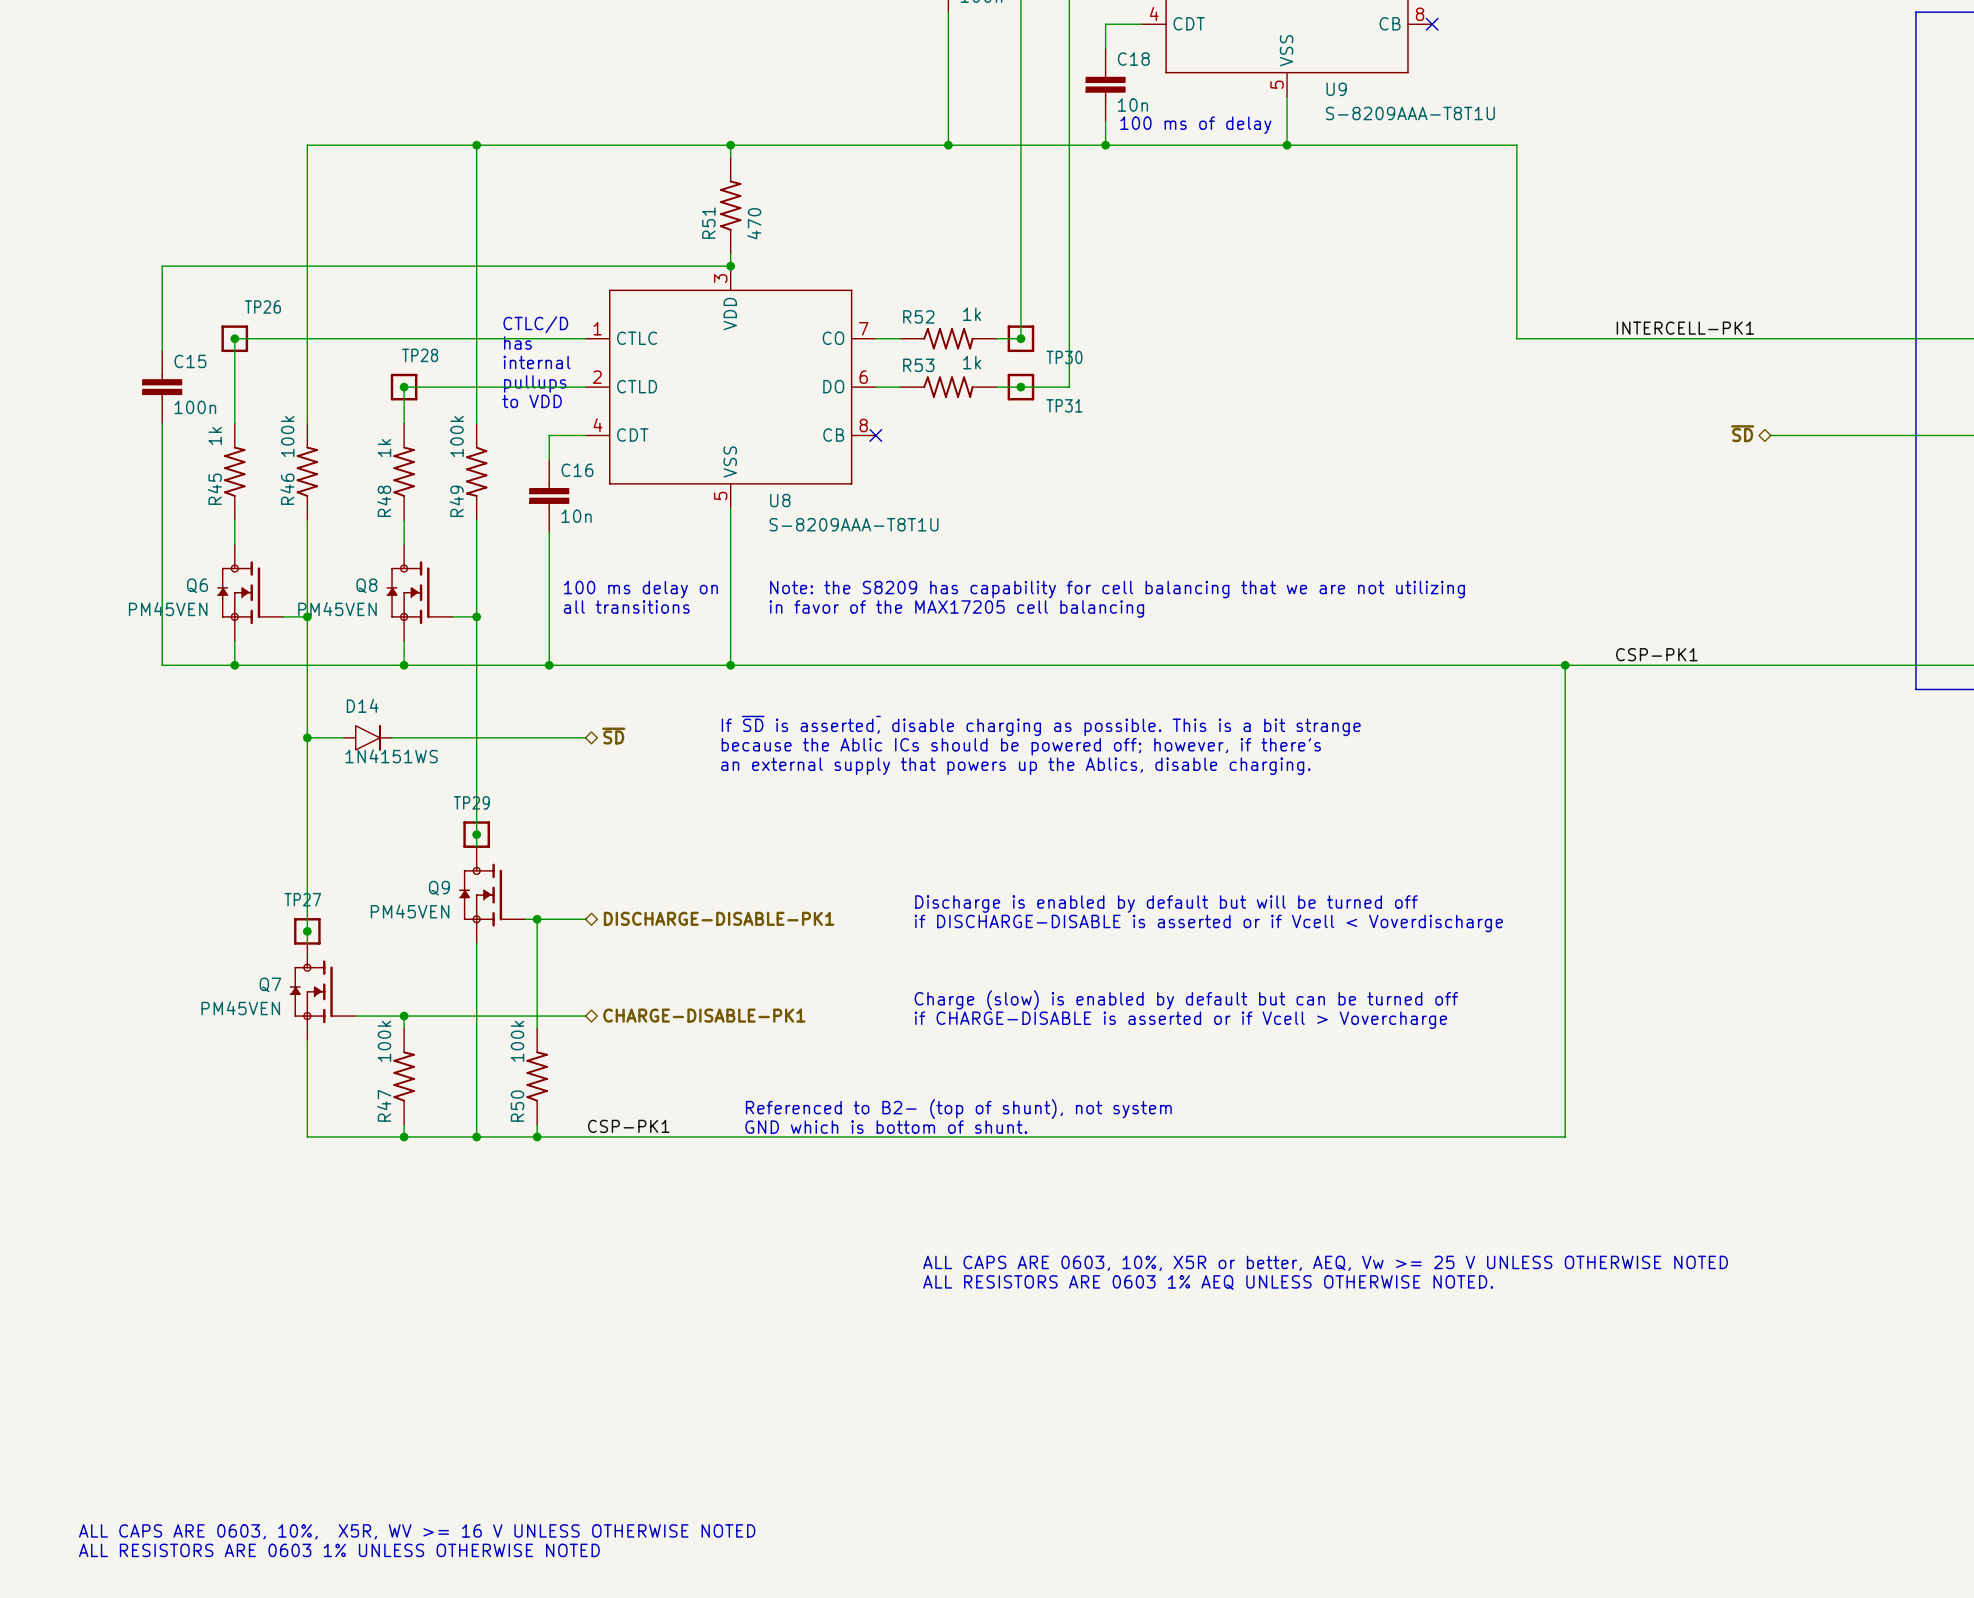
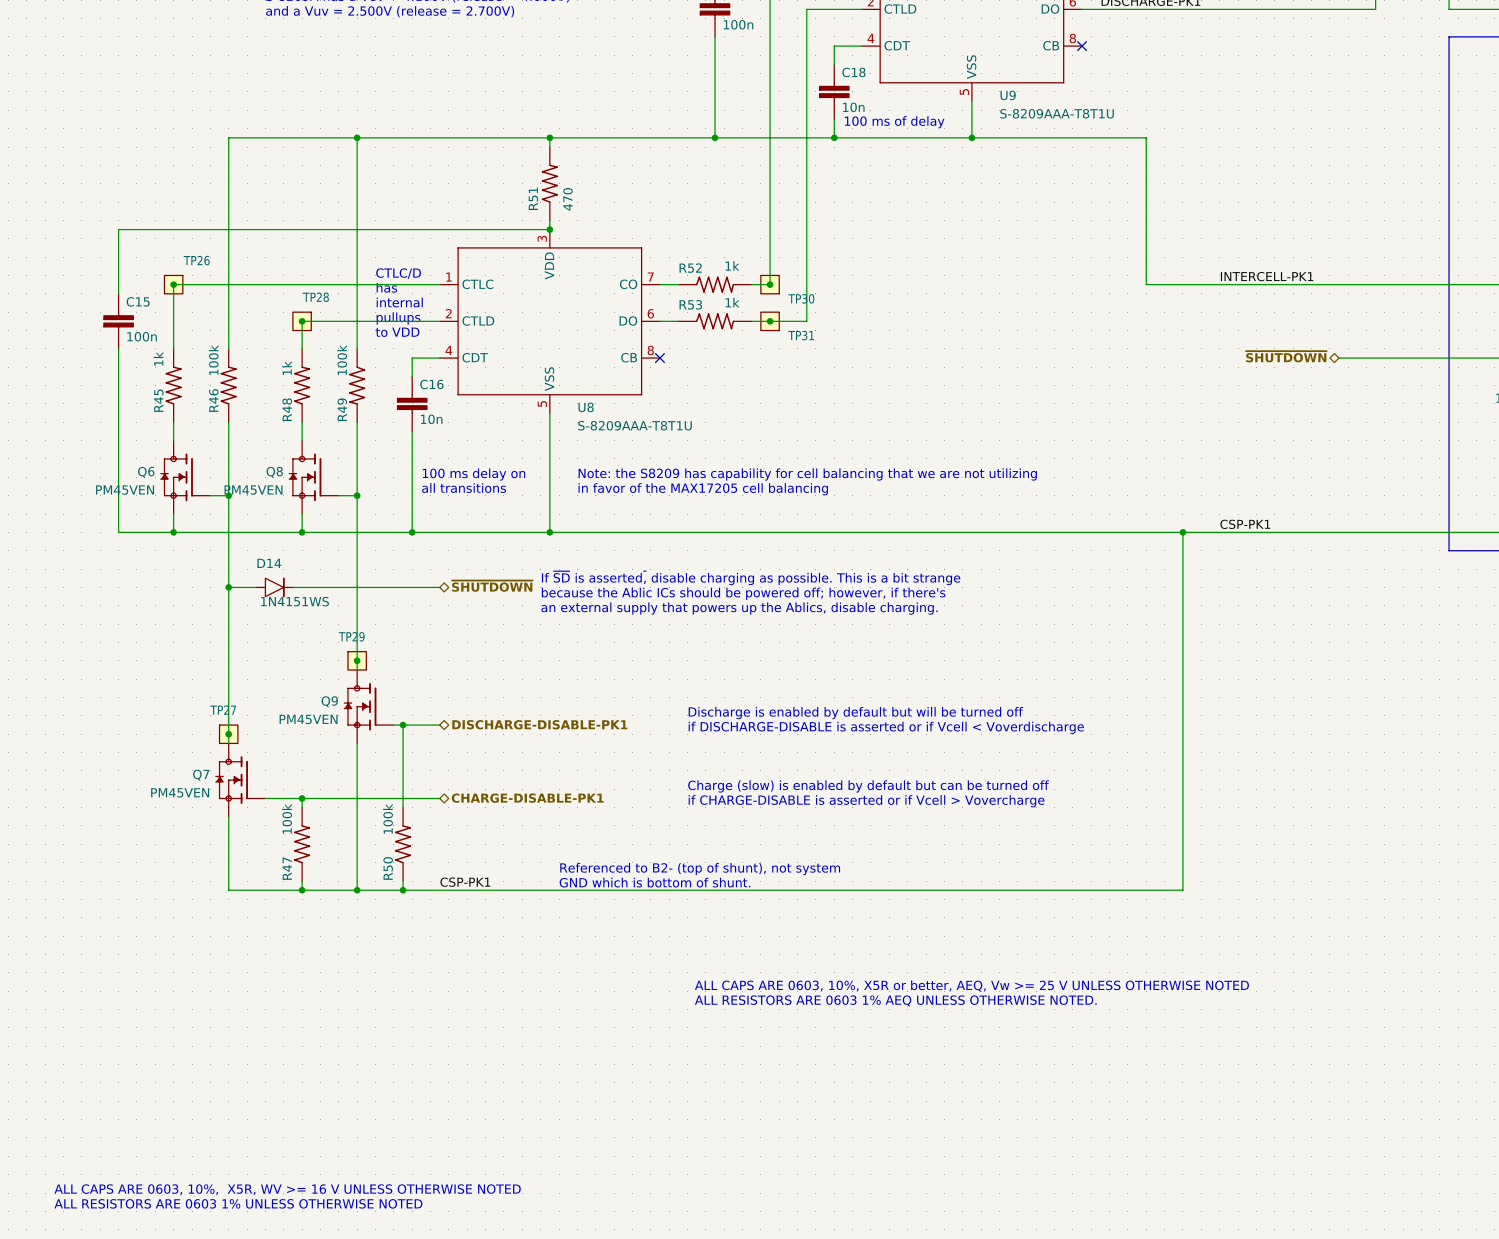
TP26 symbol: [221, 325, 249, 353] -> [164, 275, 183, 294]
TP30 symbol: [1007, 325, 1035, 353] -> [760, 275, 780, 294]
TP28 symbol: [390, 373, 418, 401] -> [292, 312, 312, 331]
TP31 symbol: [1007, 373, 1035, 401] -> [760, 312, 780, 331]
hierarchical label: ~{SD} (1742, 433) -> ~{SHUTDOWN} (1286, 356)
hierarchical label: ~{SD} (613, 736) -> ~{SHUTDOWN} (492, 586)
TP29 symbol: [463, 821, 490, 848] -> [347, 651, 367, 671]
TP27 symbol: [294, 918, 321, 945] -> [219, 725, 238, 744]

